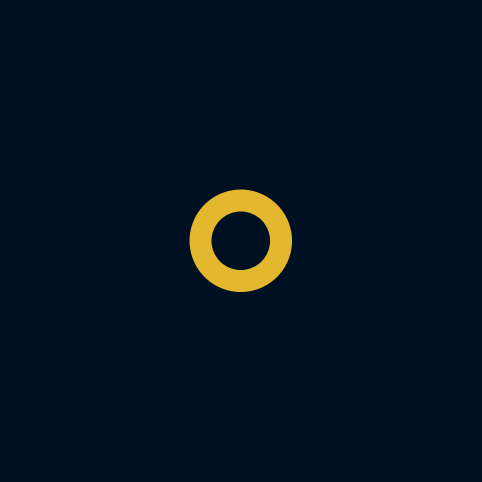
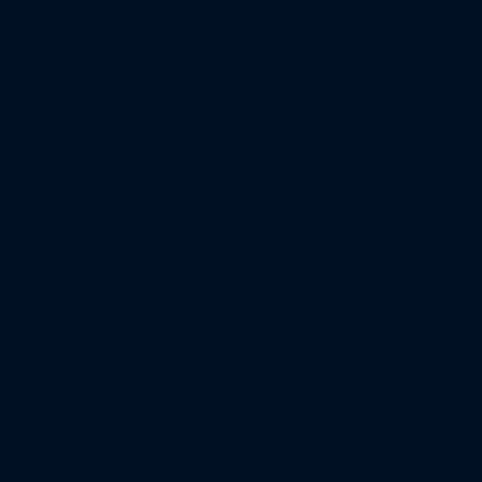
part: (240, 240) -> none

